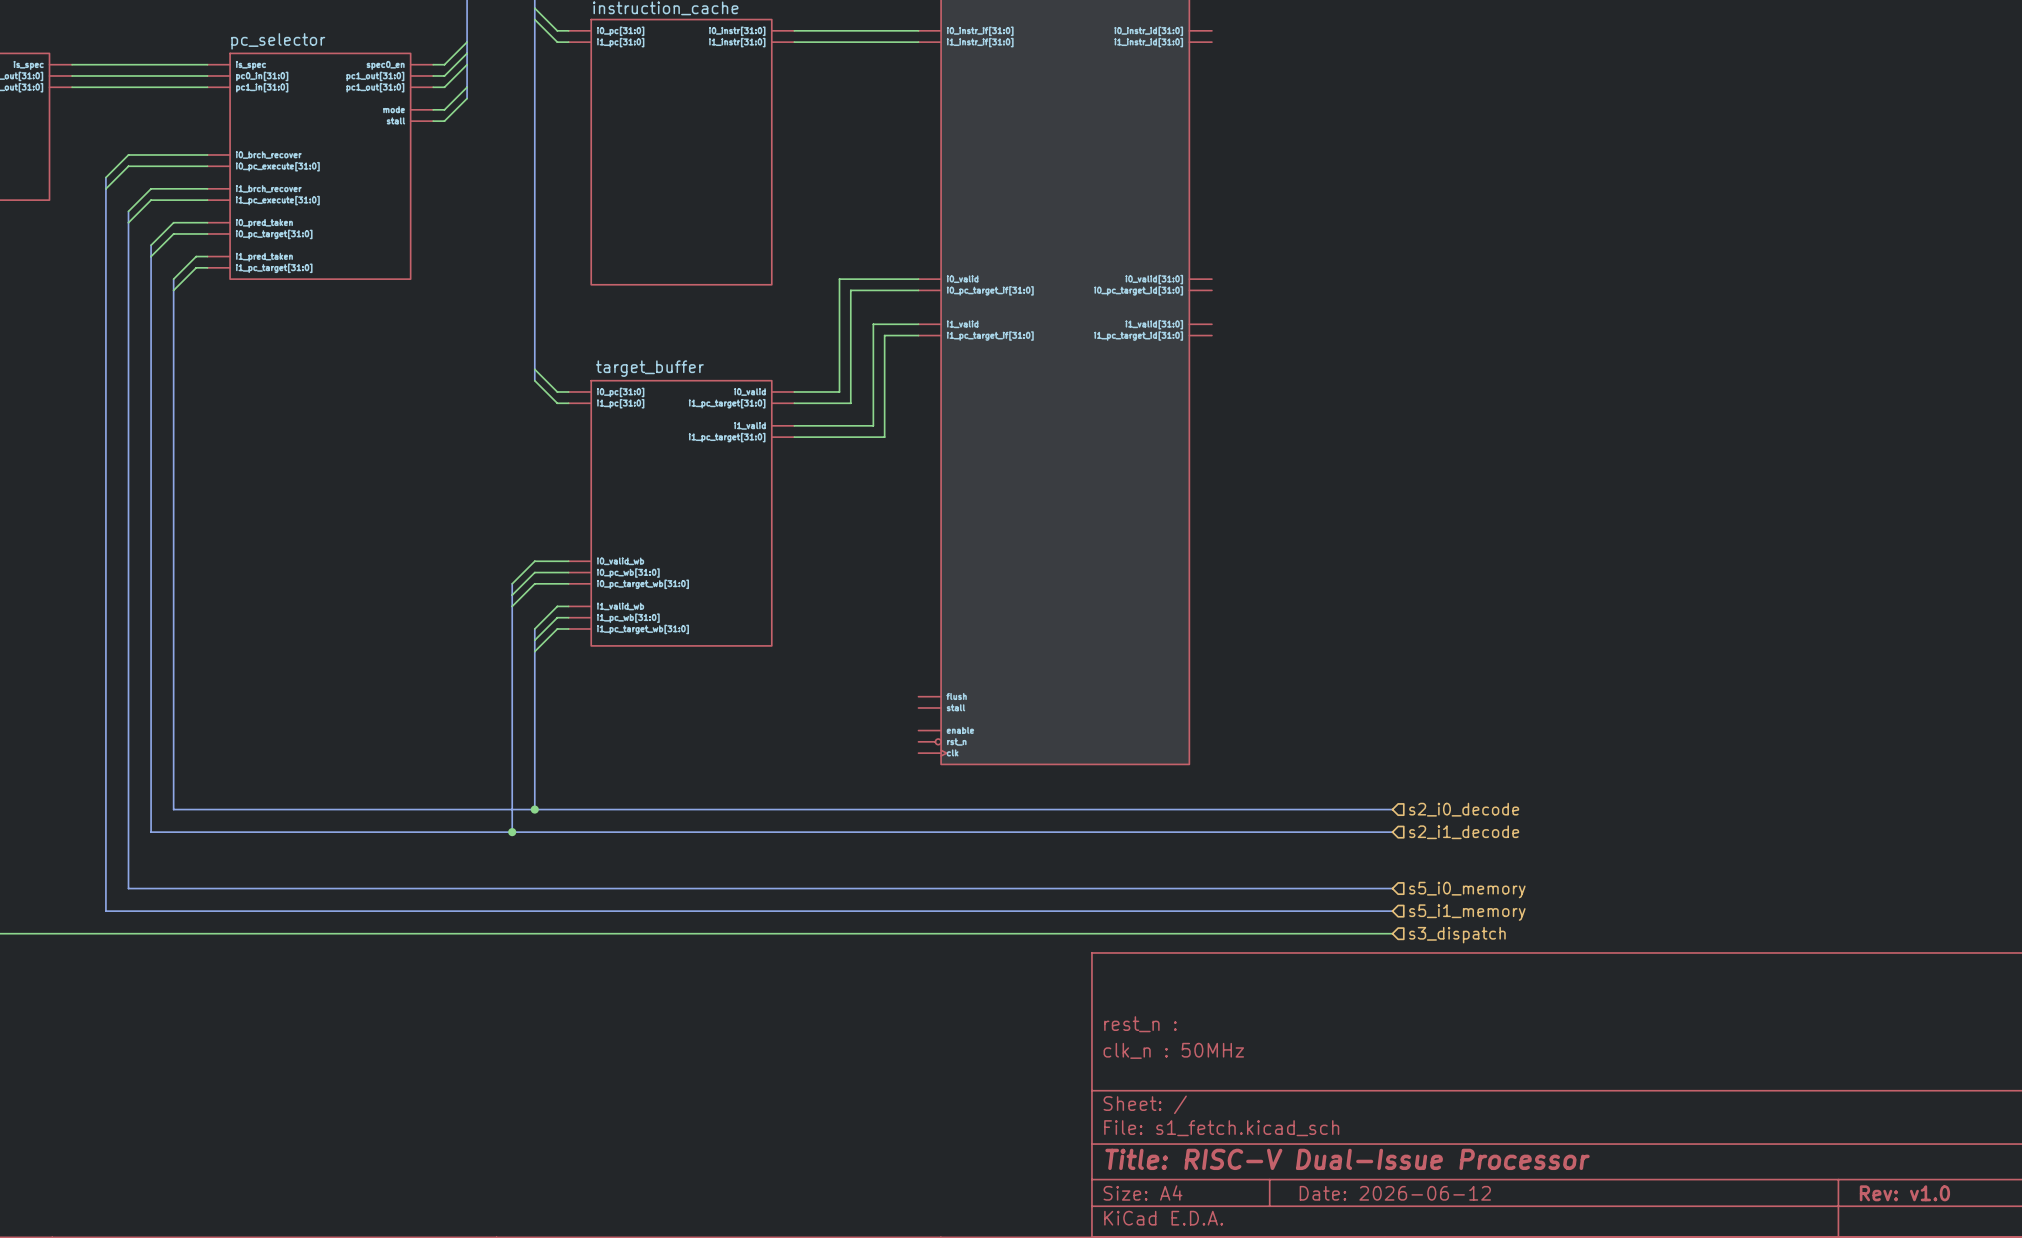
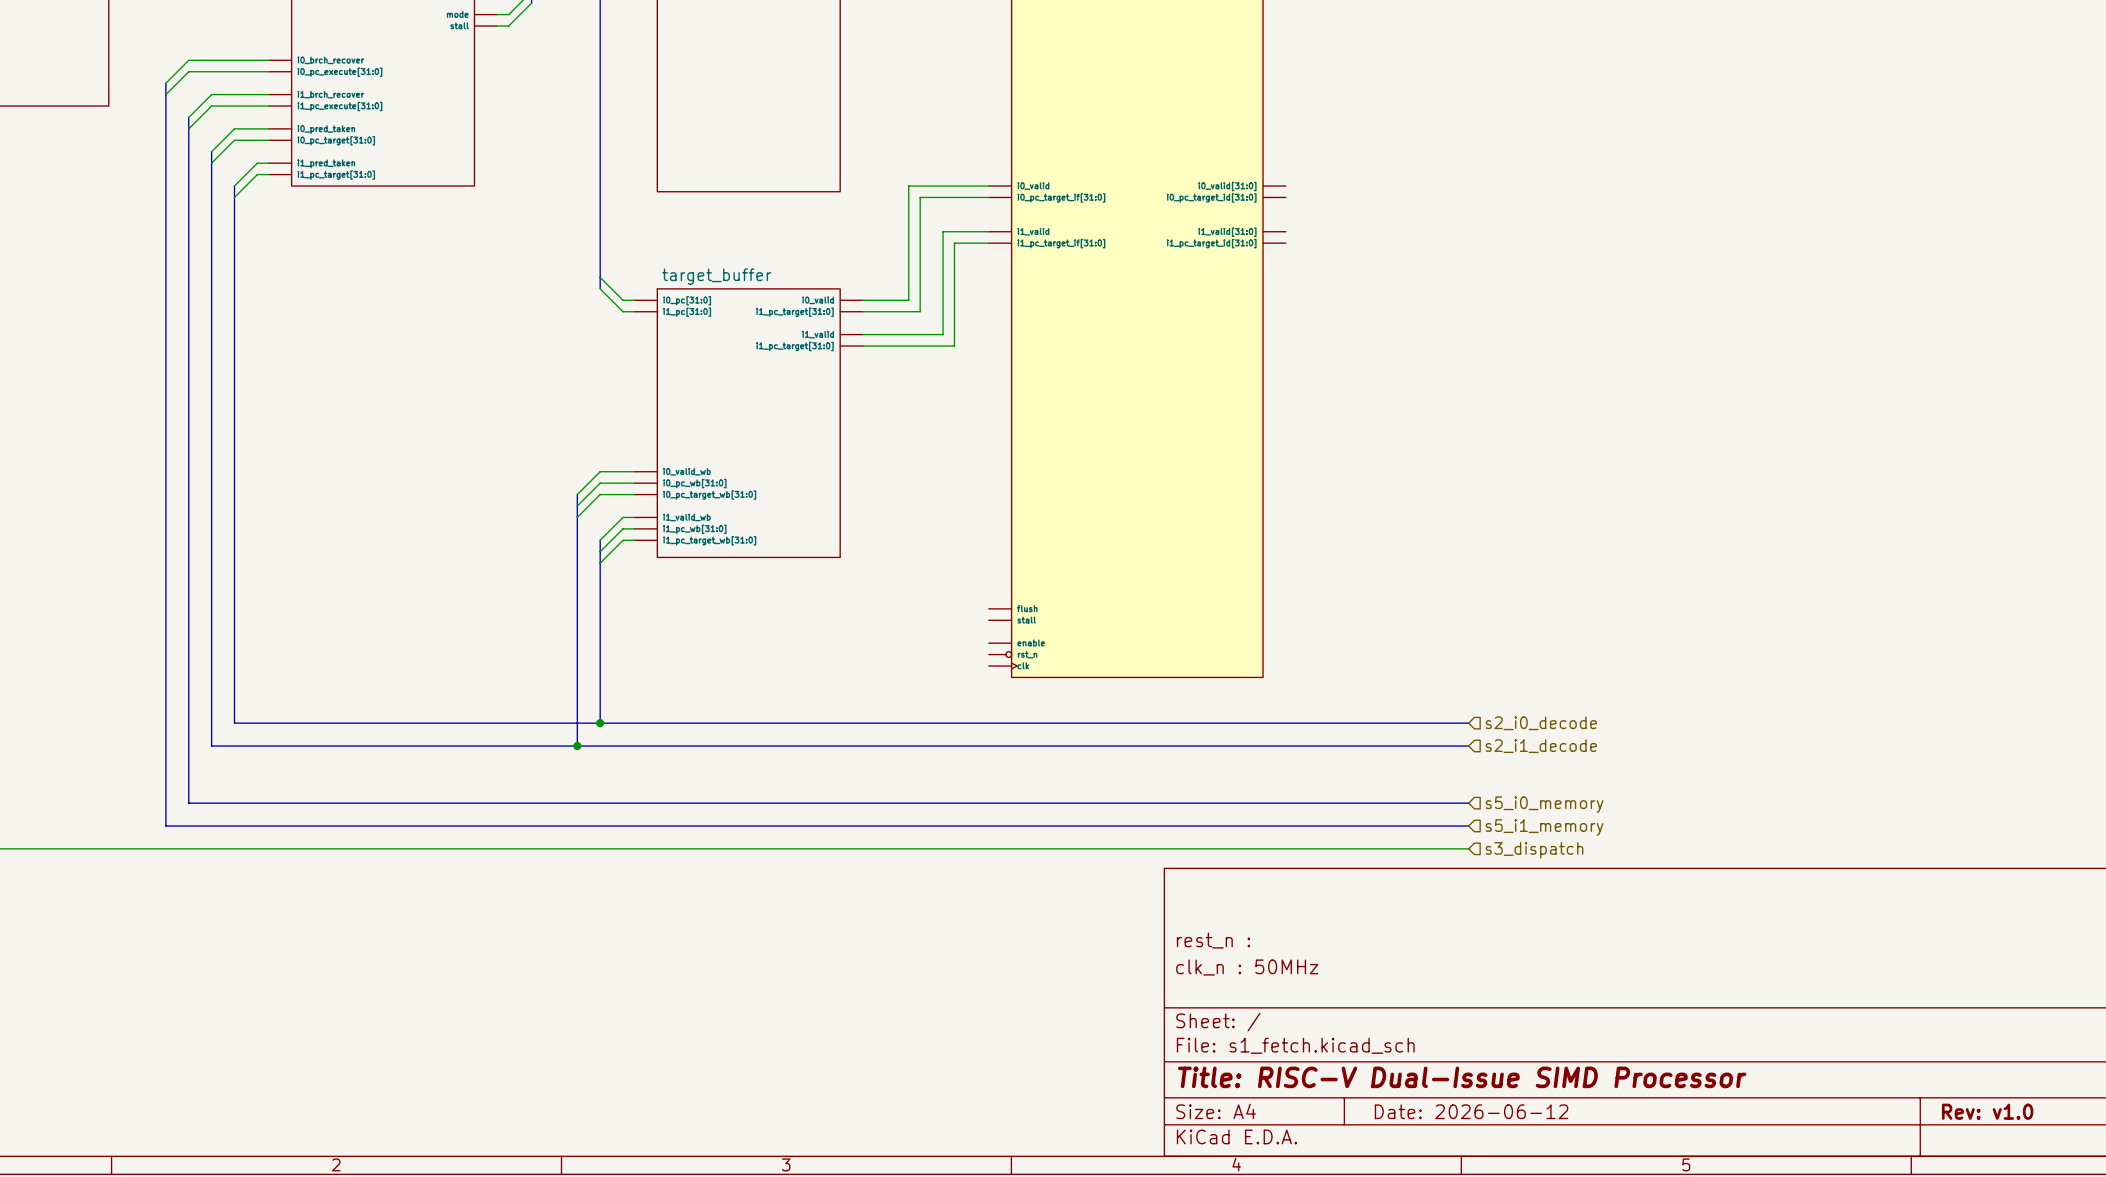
title block: Title: RISC-V Dual-Issue Processor (1347, 1159) -> Title: RISC-V Dual-Issue SIMD Processor (1462, 1077)

